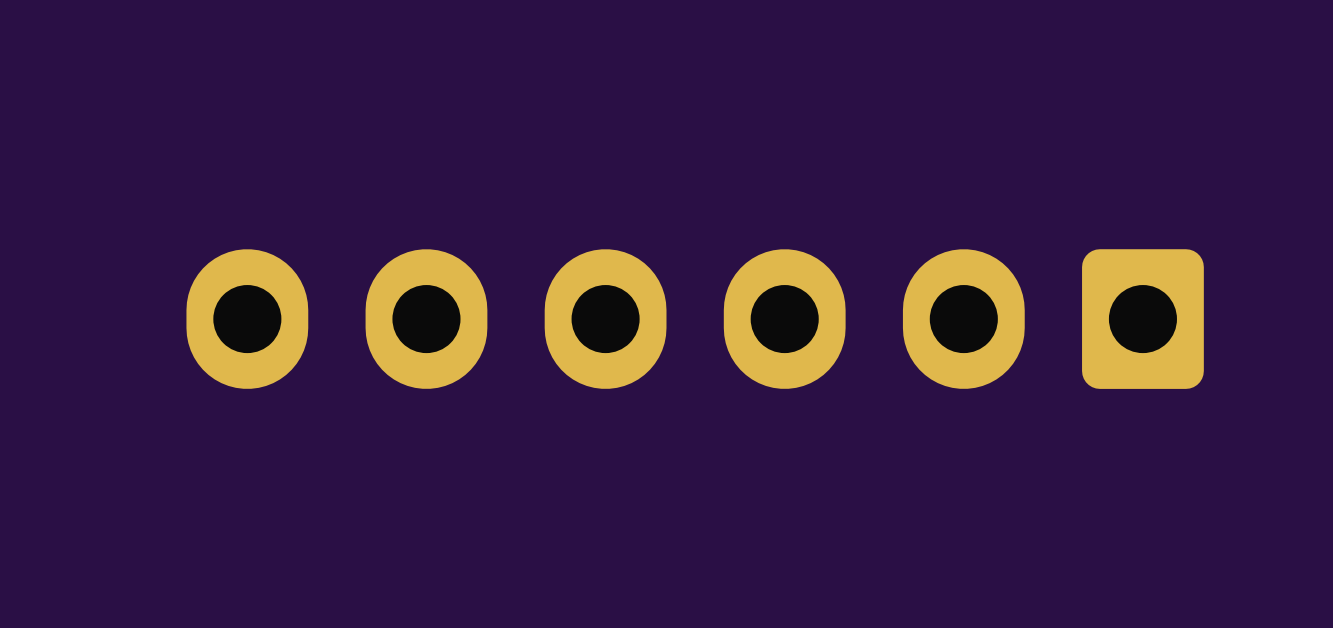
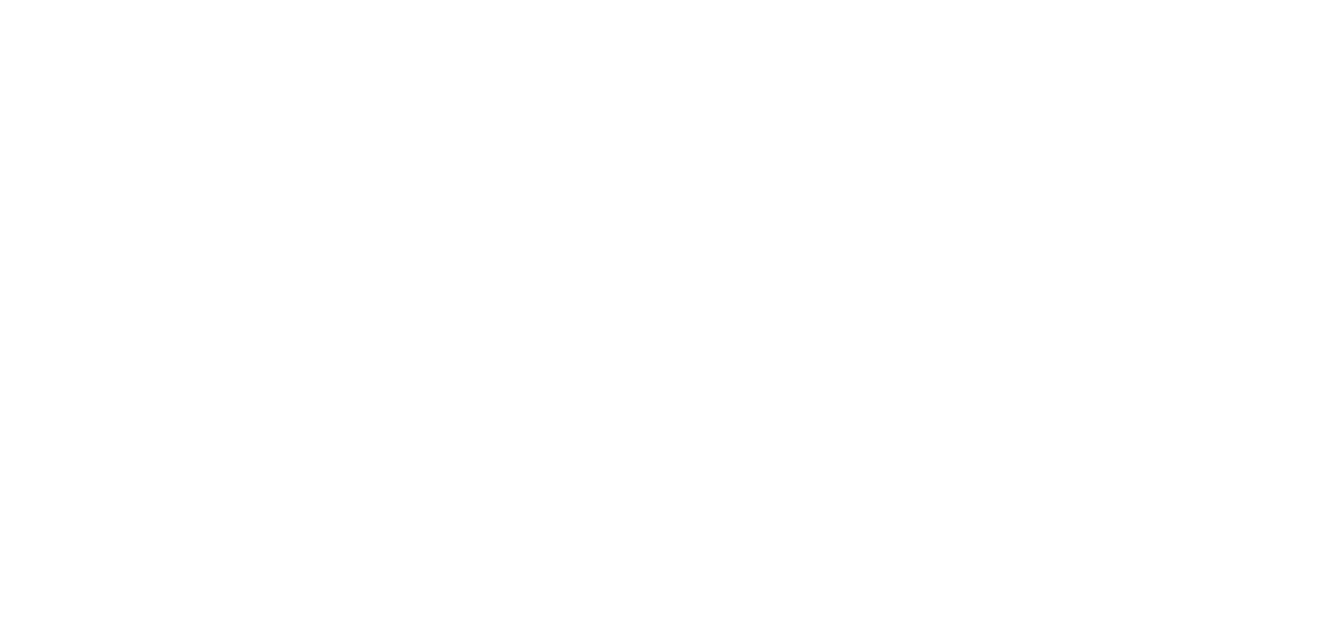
part: (695, 319) -> none

